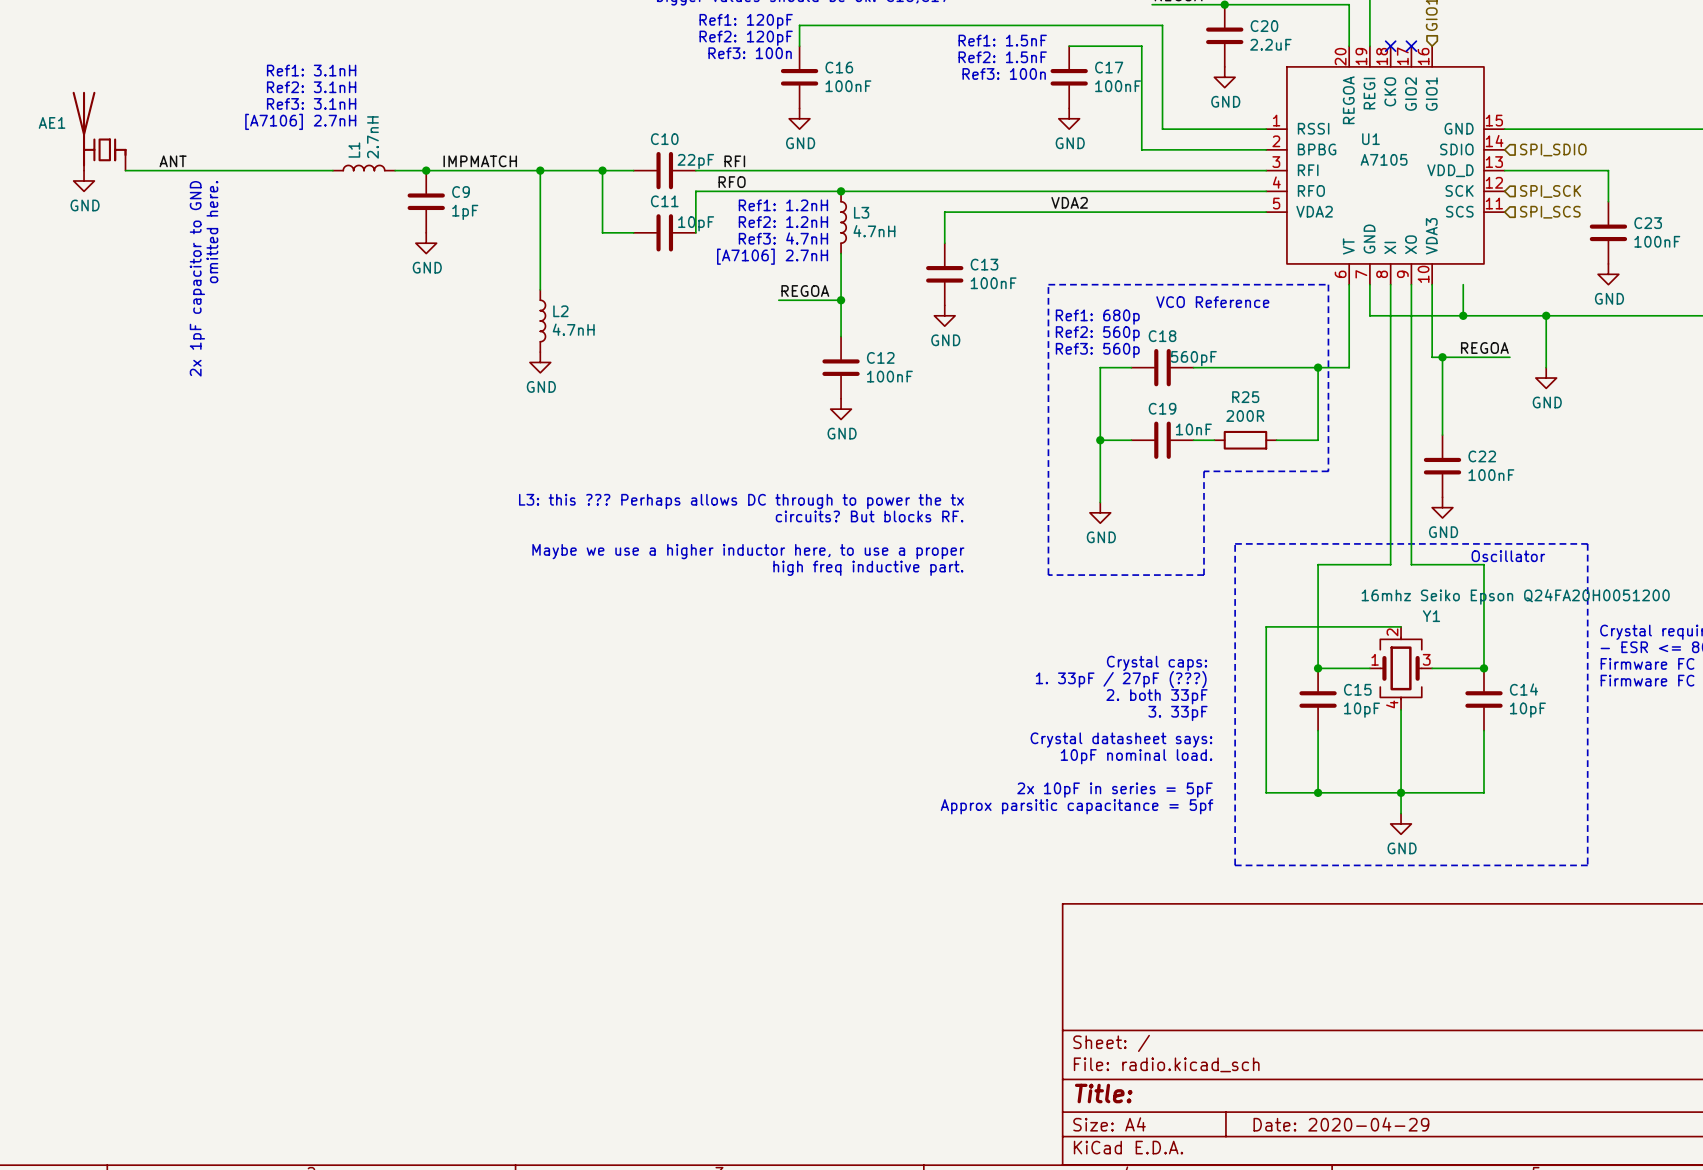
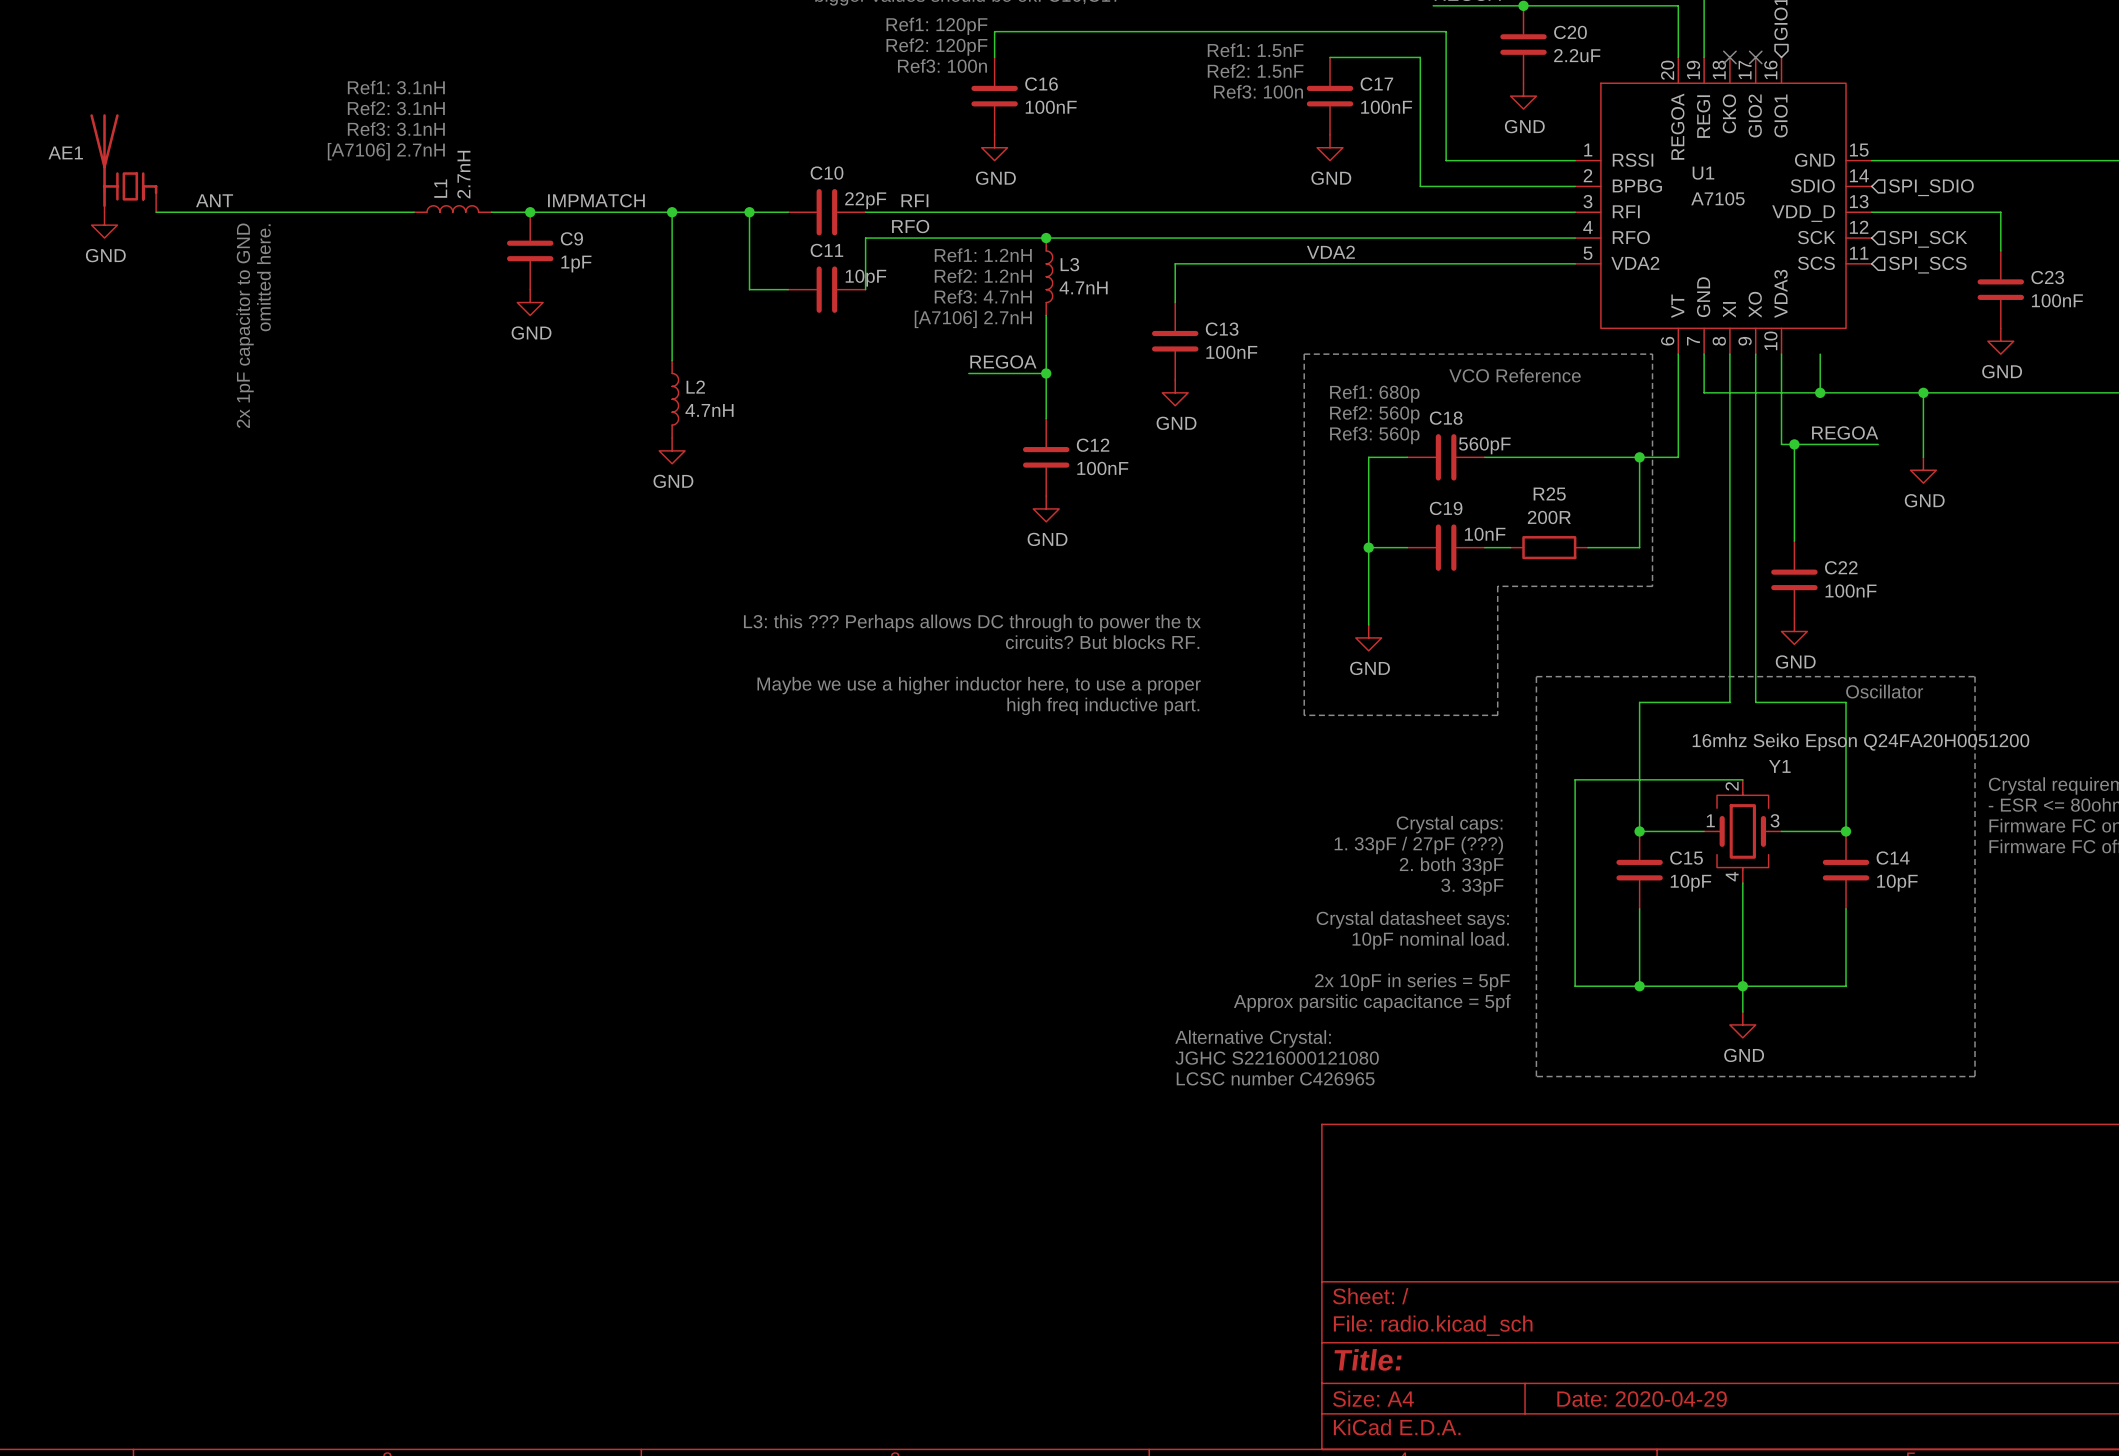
text: none -> Alternative Crystal: (1253, 1038)
text: none -> JGHC S2216000121080 (1277, 1058)
text: none -> LCSC number C426965 (1275, 1078)

